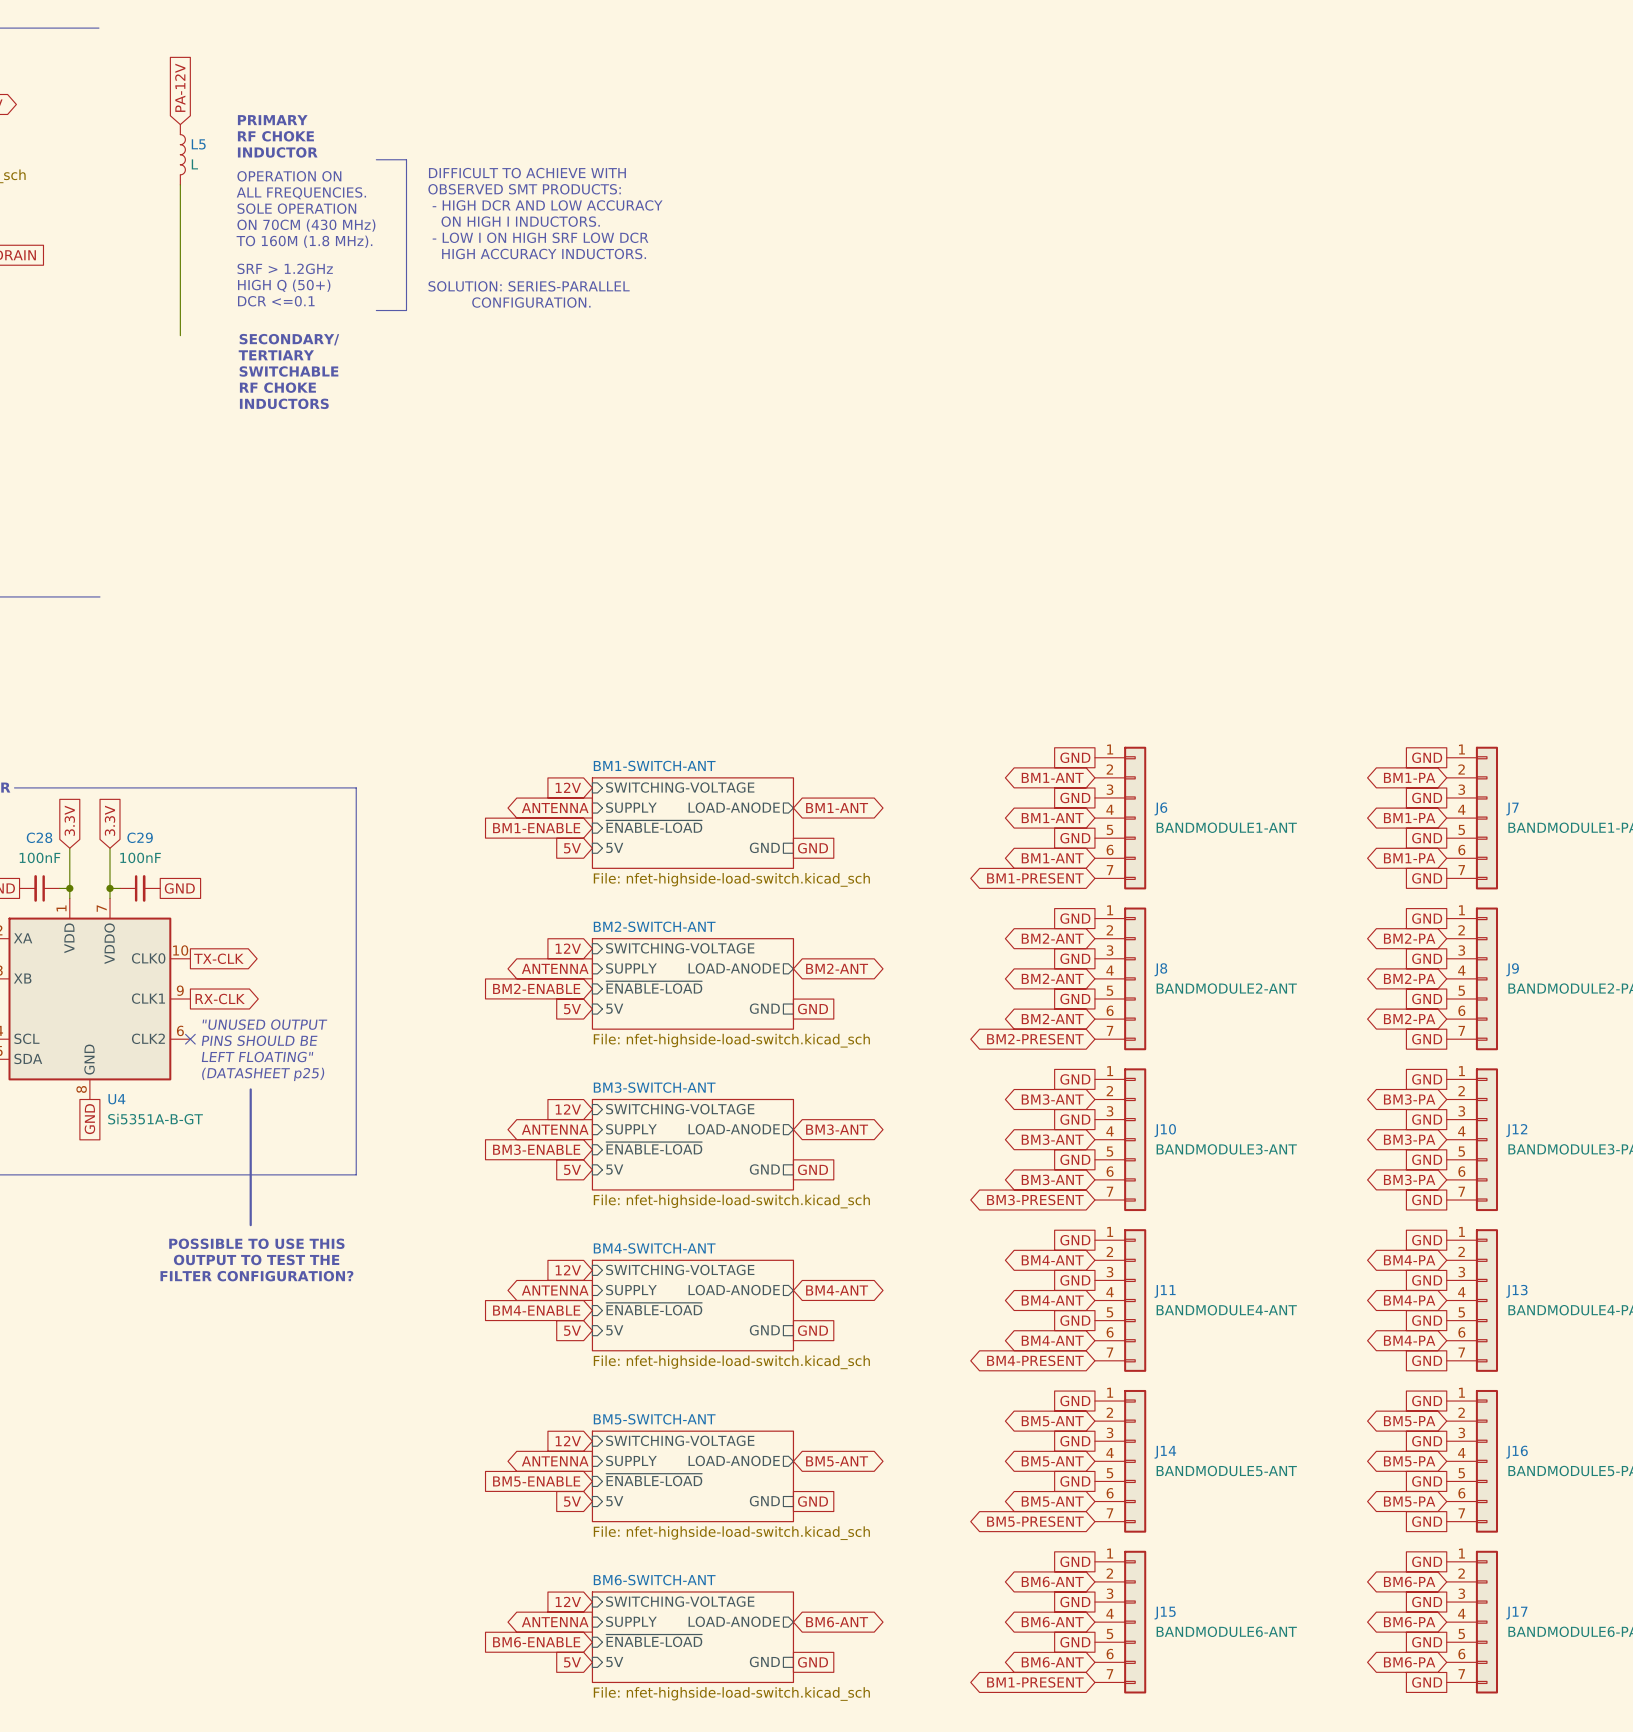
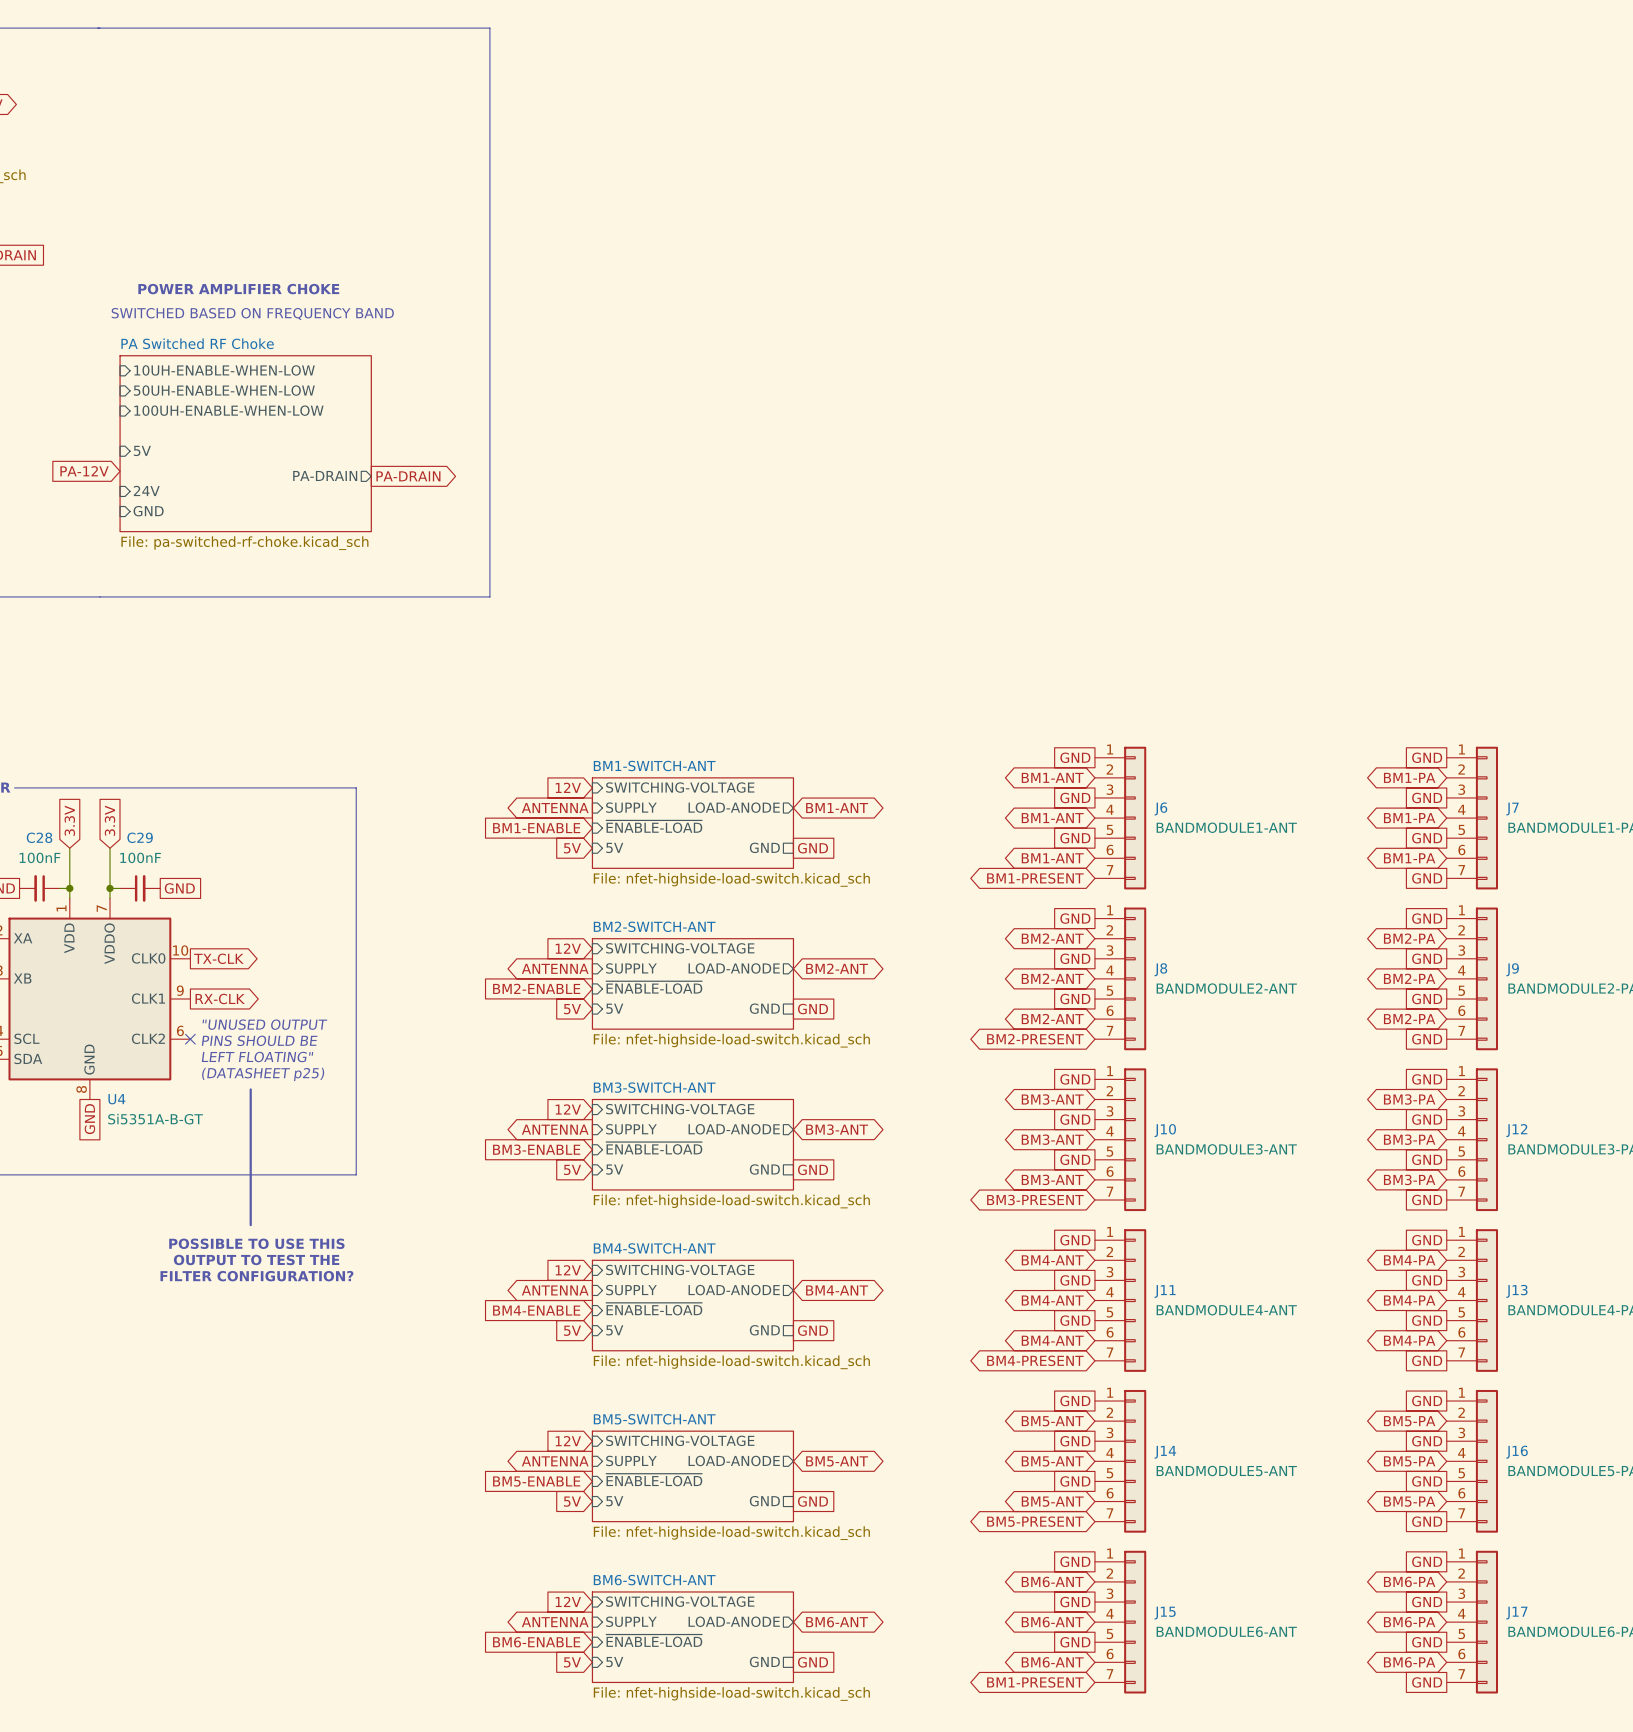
line: none -> (98, 28) (489, 28) (489, 596) (99, 596)
global label: PA-12V (180, 87) -> none
text: PRIMARY (272, 120) -> none
text: RF CHOKE (275, 136) -> none
text: INDUCTOR (277, 152) -> none
L5: L (182, 154) -> none
line: (376, 159) (406, 159) (406, 310) (376, 310) -> none
text: DIFFICULT TO ACHIEVE WITH (527, 173) -> none
text: OPERATION ON (289, 176) -> none
wire: (180, 184) (180, 335) -> none
text: OBSERVED SMT PRODUCTS: (524, 189) -> none
text: ALL FREQUENCIES. (301, 193) -> none
text: - HIGH DCR AND LOW ACCURACY (547, 205) -> none
text: SOLE OPERATION (296, 208) -> none
text: ON HIGH I INDUCTORS. (520, 221) -> none
text: ON 70CM (430 MHz) (306, 225) -> none
text: - LOW I ON HIGH SRF LOW DCR (540, 237) -> none
text: TO 160M (1.8 MHz). (304, 241) -> none
text: HIGH ACCURACY INDUCTORS. (544, 254) -> none
text: SRF > 1.2GHz (285, 268) -> none
text: HIGH Q (50+) (284, 285) -> POWER AMPLIFIER CHOKE (238, 289)
text: SOLUTION: SERIES-PARALLEL (529, 286) -> none
text: DCR <=0.1 (276, 301) -> none
text: CONFIGURATION. (531, 302) -> none
text: none -> SWITCHED BASED ON FREQUENCY BAND (252, 313)
text: SECONDARY/ (289, 339) -> none
text: TERTIARY (276, 355) -> none
sheet pin: none -> 10UH-ENABLE-WHEN-LOW (224, 370)
text: SWITCHABLE (288, 371) -> none
text: RF CHOKE (277, 387) -> none
sheet pin: none -> 50UH-ENABLE-WHEN-LOW (224, 390)
text: INDUCTORS (284, 403) -> none
sheet pin: none -> 100UH-ENABLE-WHEN-LOW (228, 410)
sheet PA Switched RF Choke: none -> File: pa-switched-rf-choke.kicad_sch (245, 443)
sheet pin: none -> 5V (142, 450)
global label: none -> PA-12V (84, 471)
sheet pin: none -> PA-DRAIN (325, 475)
global label: none -> PA-DRAIN (408, 476)
sheet pin: none -> 24V (146, 490)
sheet pin: none -> GND (148, 511)

